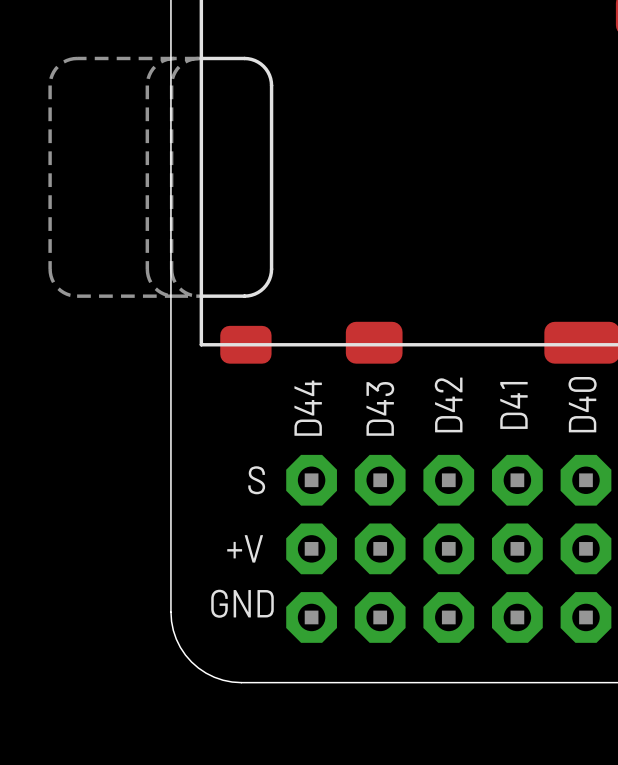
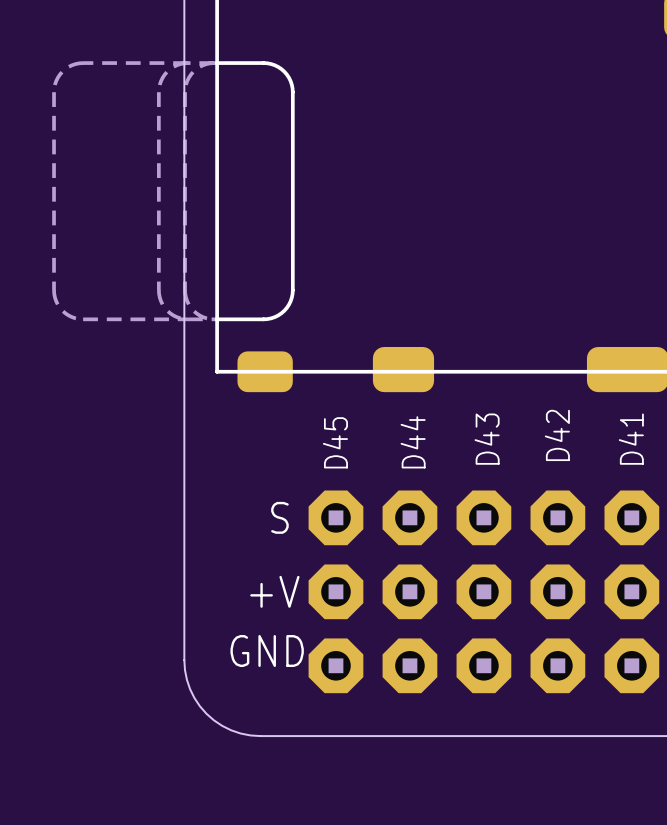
text: D42 (448, 404) -> D43 (487, 439)
text: D40 (582, 404) -> D41 (631, 439)
text: D41 (513, 405) -> D42 (557, 435)
text: D44 (308, 408) -> D45 (335, 442)
text: D43 (380, 408) -> D44 (413, 442)

